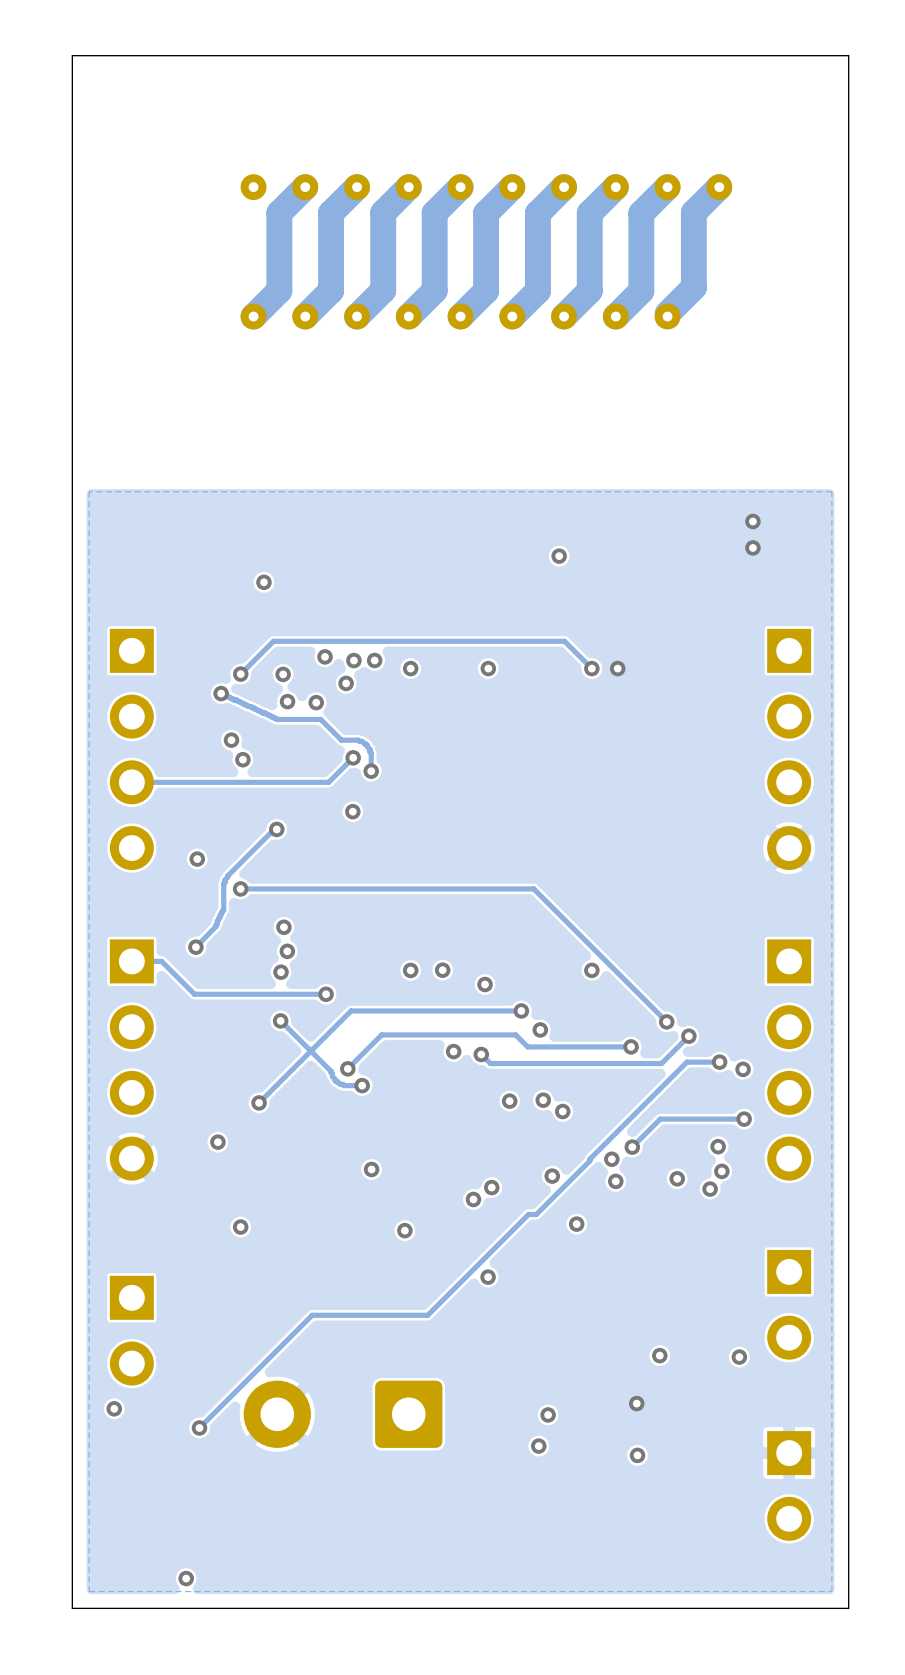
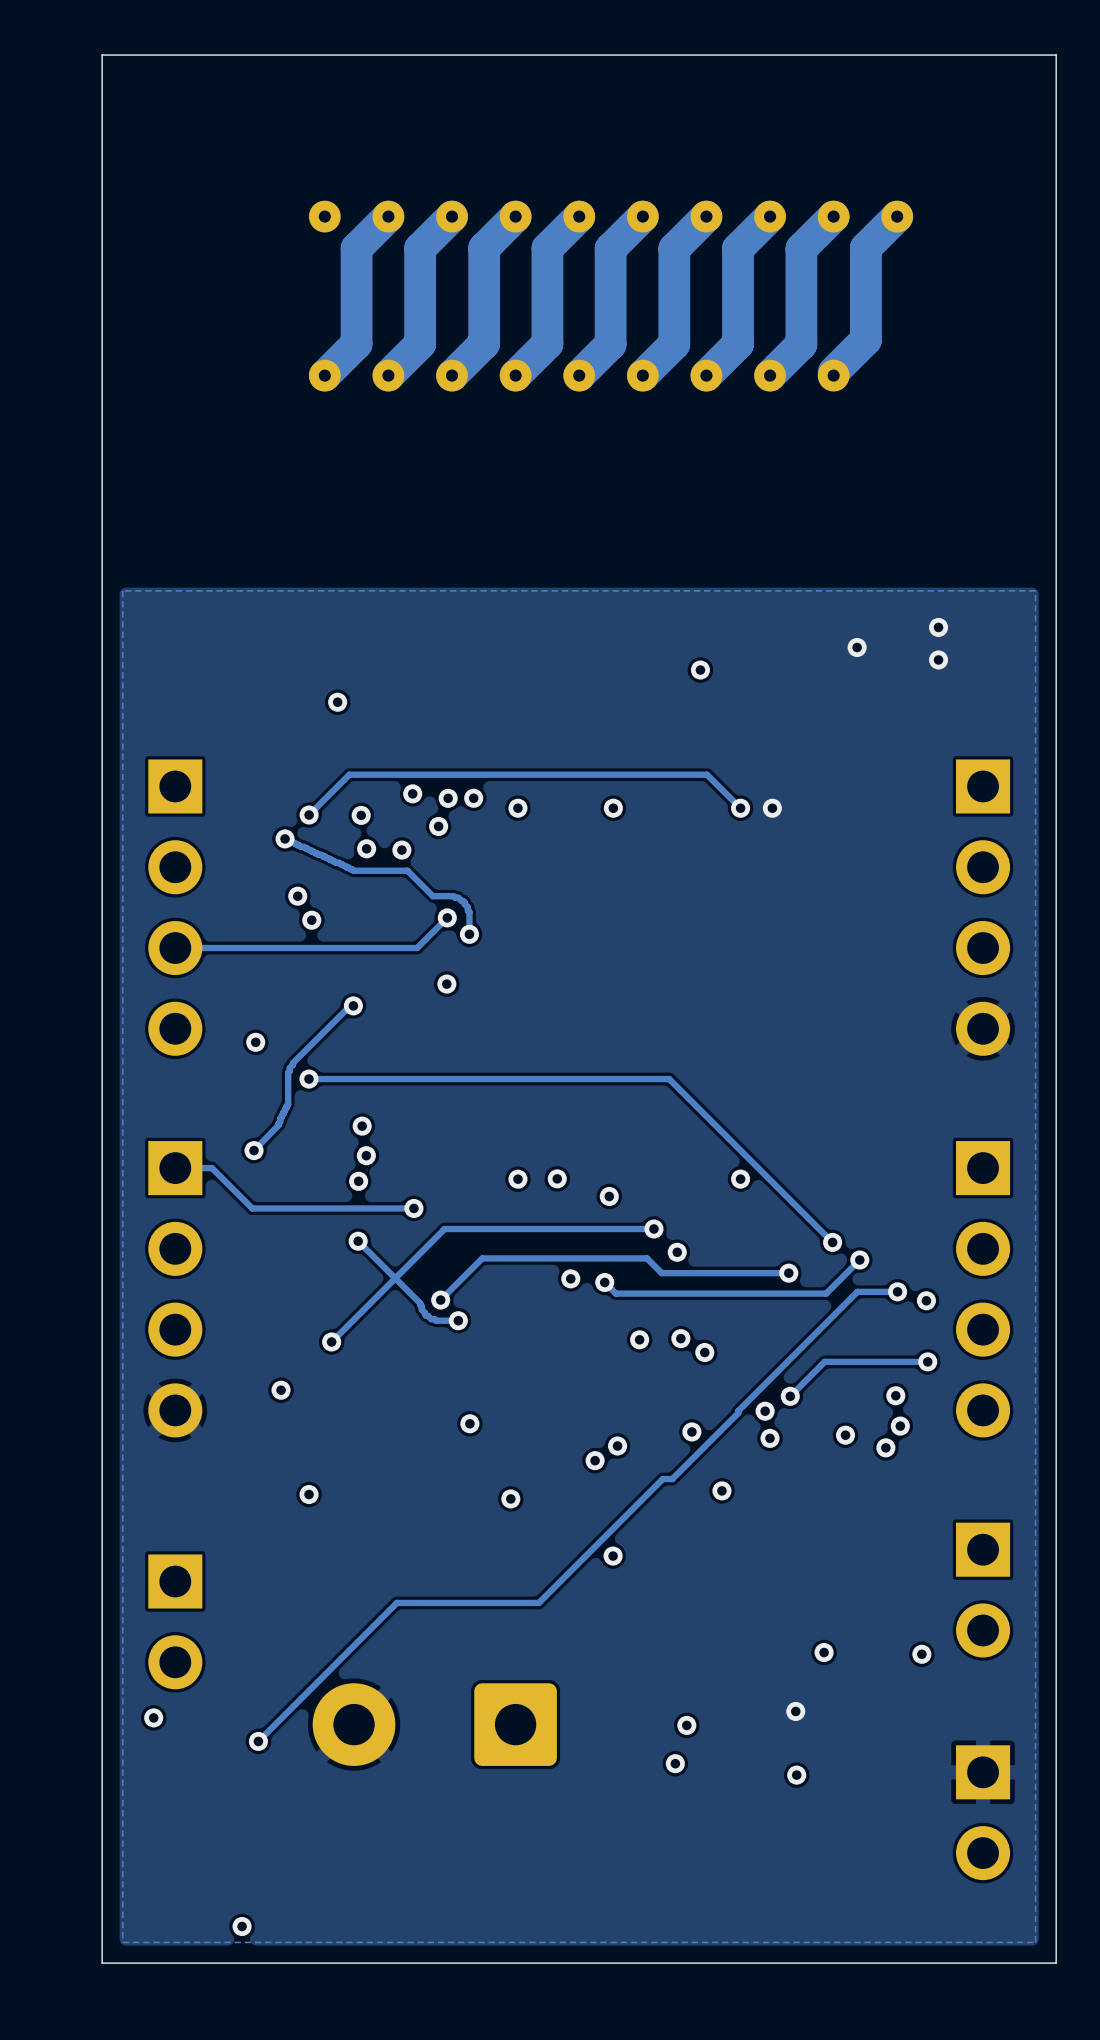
via: none -> (857, 647)

